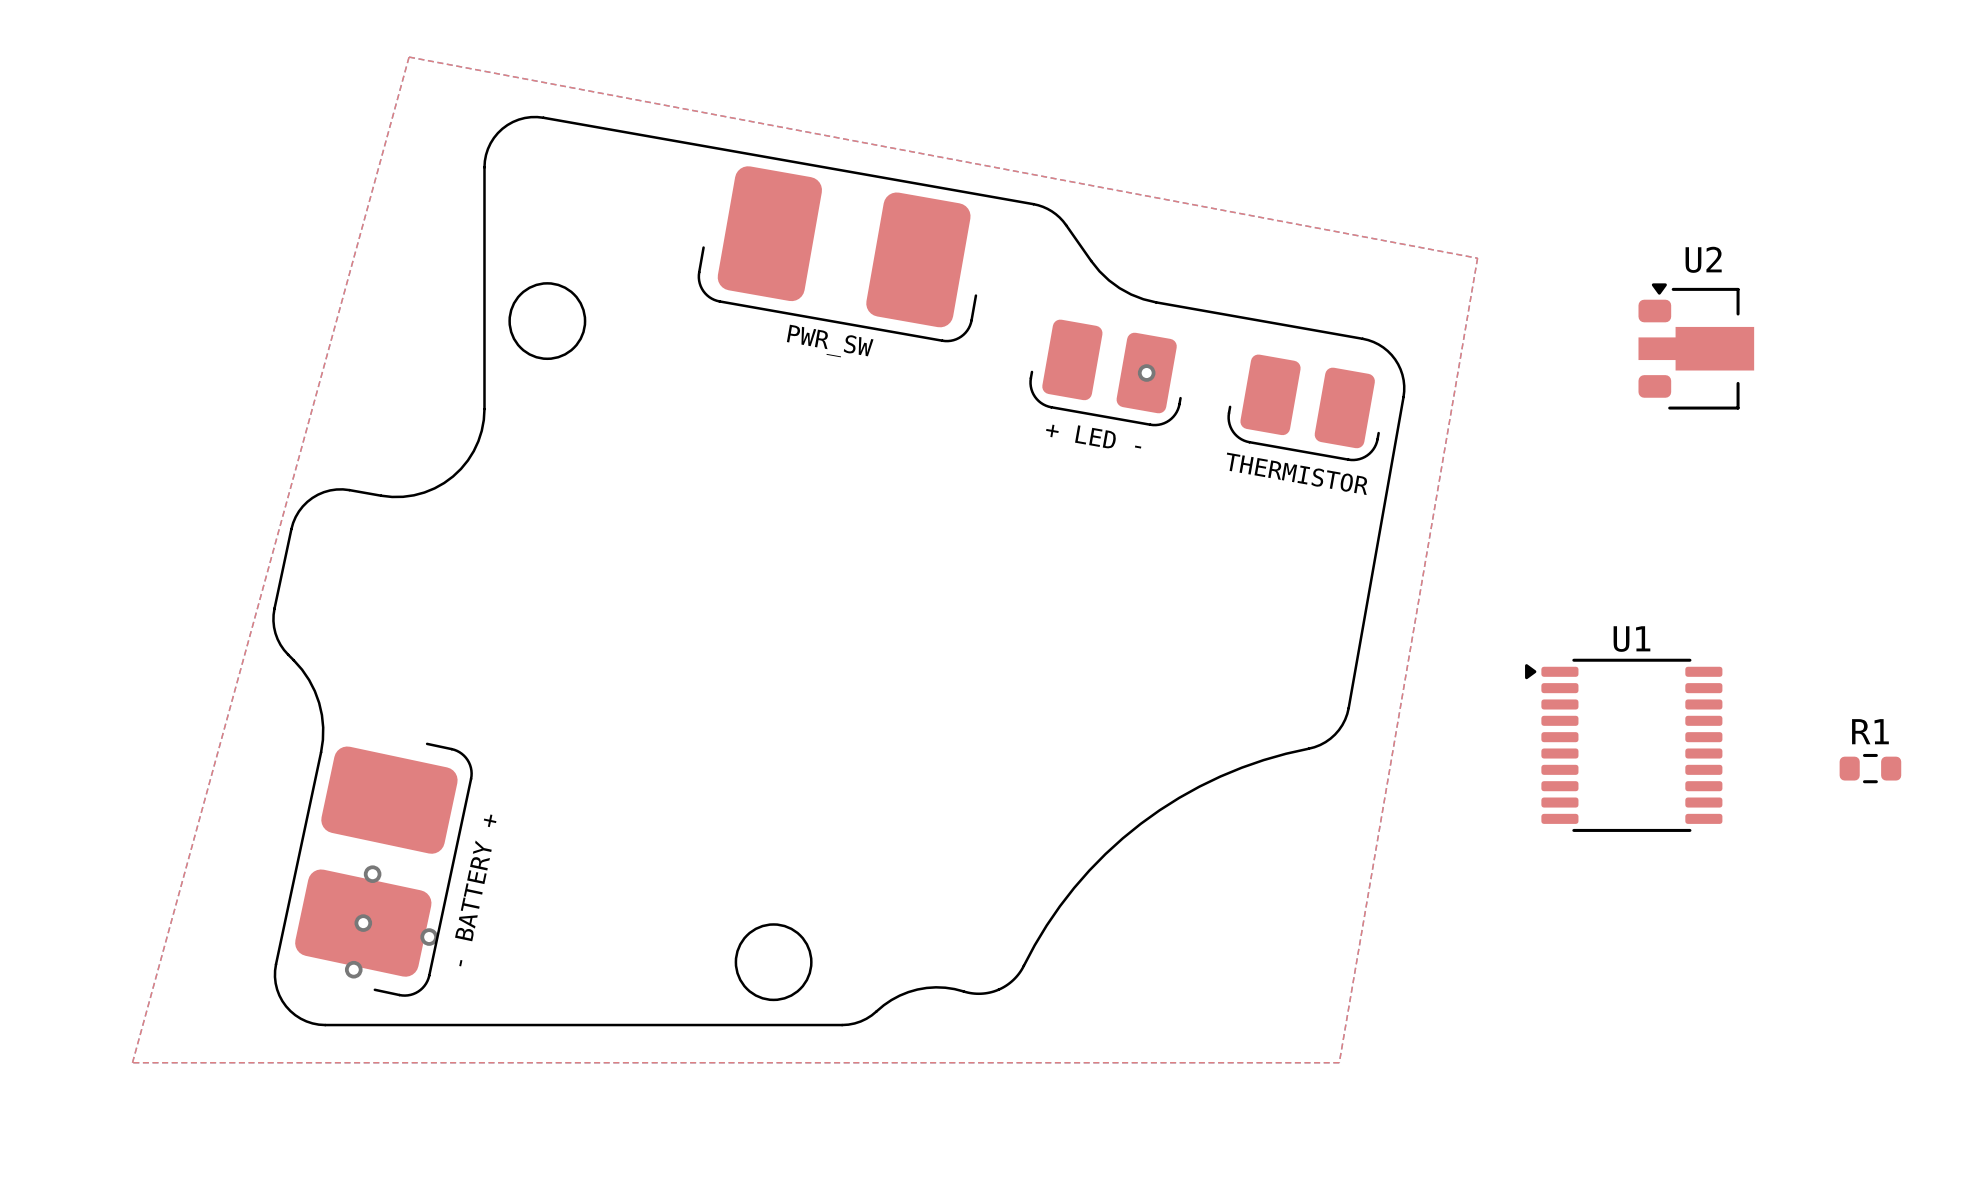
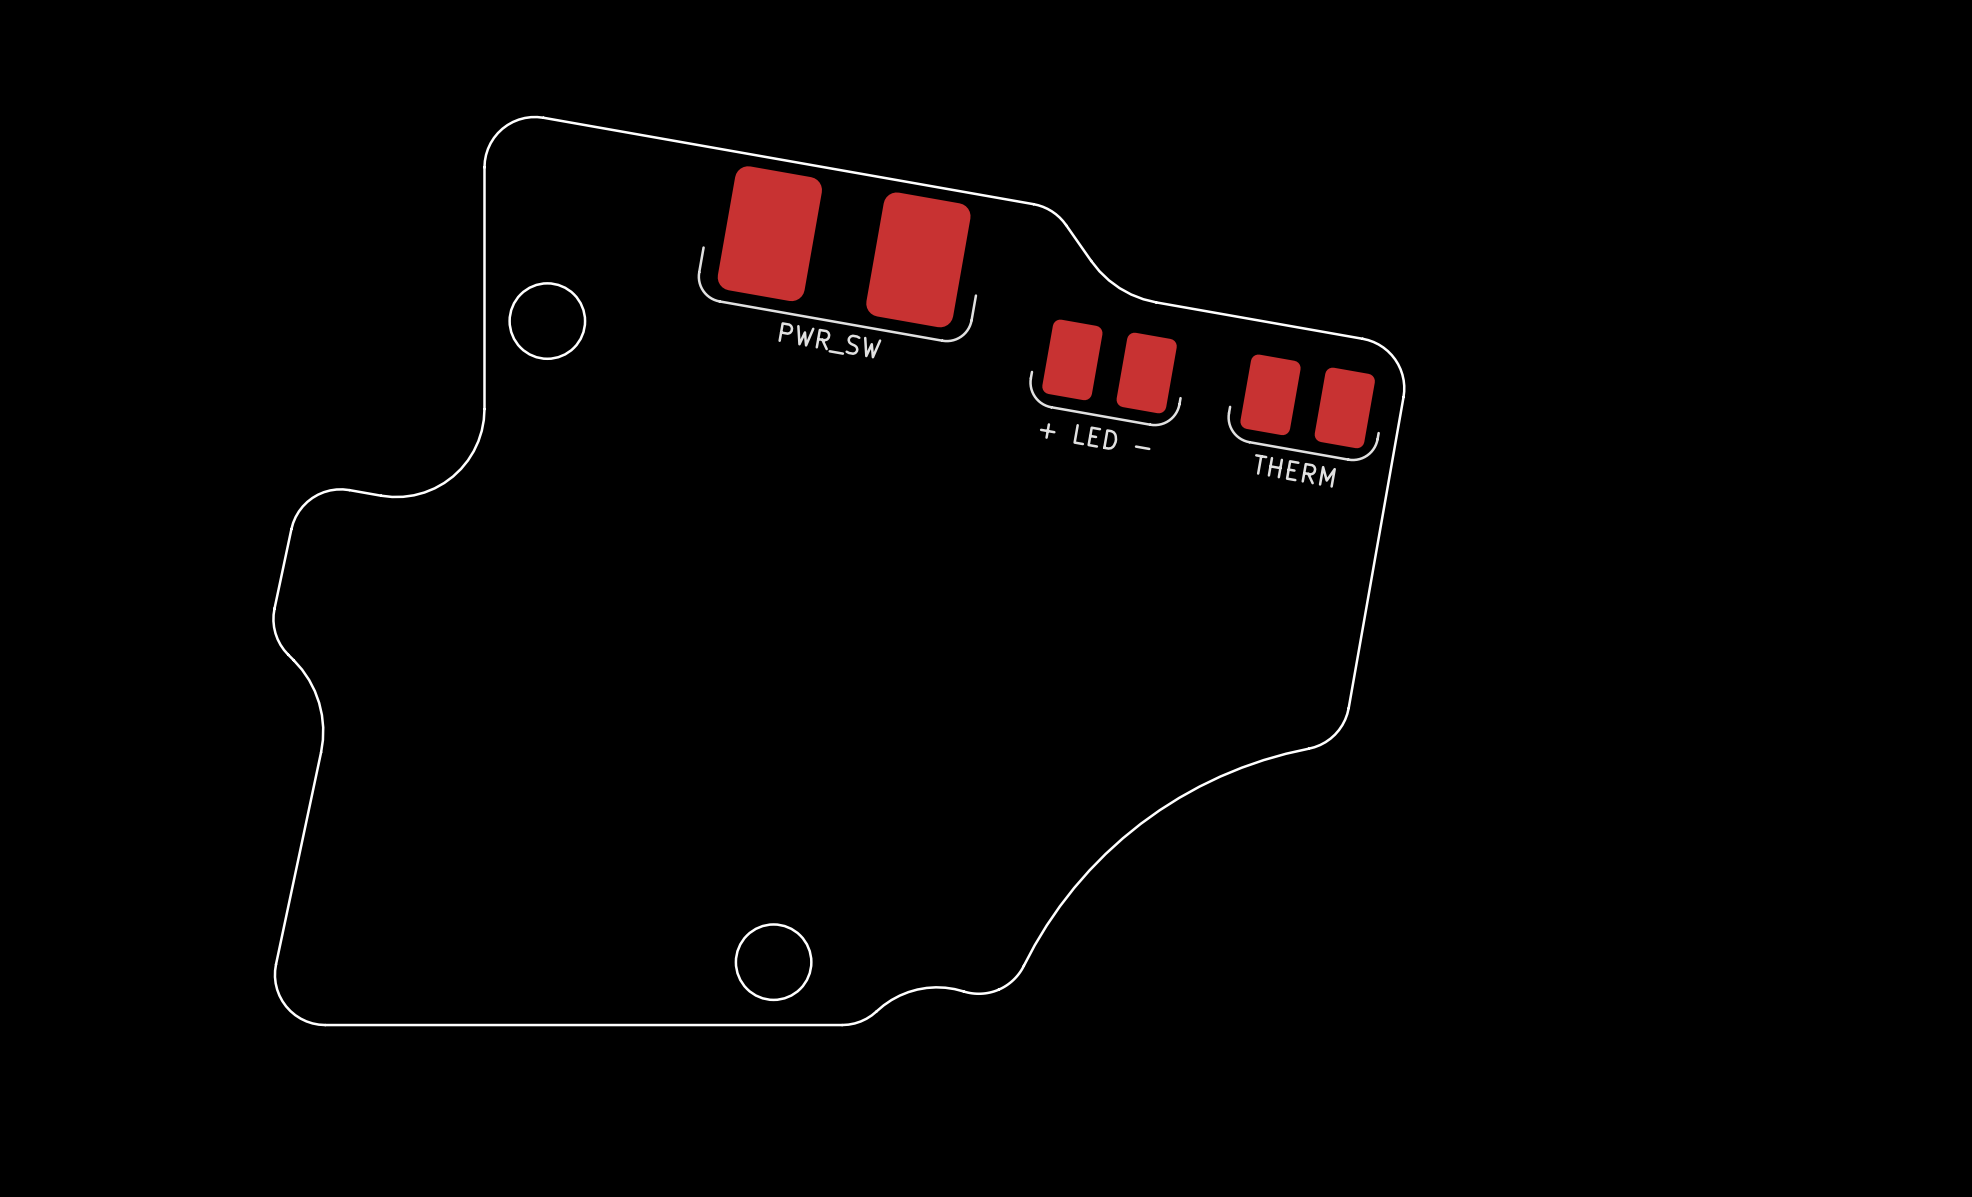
top zone outline: (409, 57) (132, 1062) (1339, 1062) (1477, 258) (409, 57) -> none
U2: (1696, 346) -> none
via: (1146, 373) -> none
text: THERMISTOR (1297, 473) -> THERM (1295, 470)
U1: (1623, 745) -> none
R1: (1870, 768) -> none
part: (384, 869) -> none
via: (372, 874) -> none
text: - BATTERY + (475, 890) -> none
via: (363, 923) -> none
via: (429, 937) -> none
via: (353, 969) -> none

